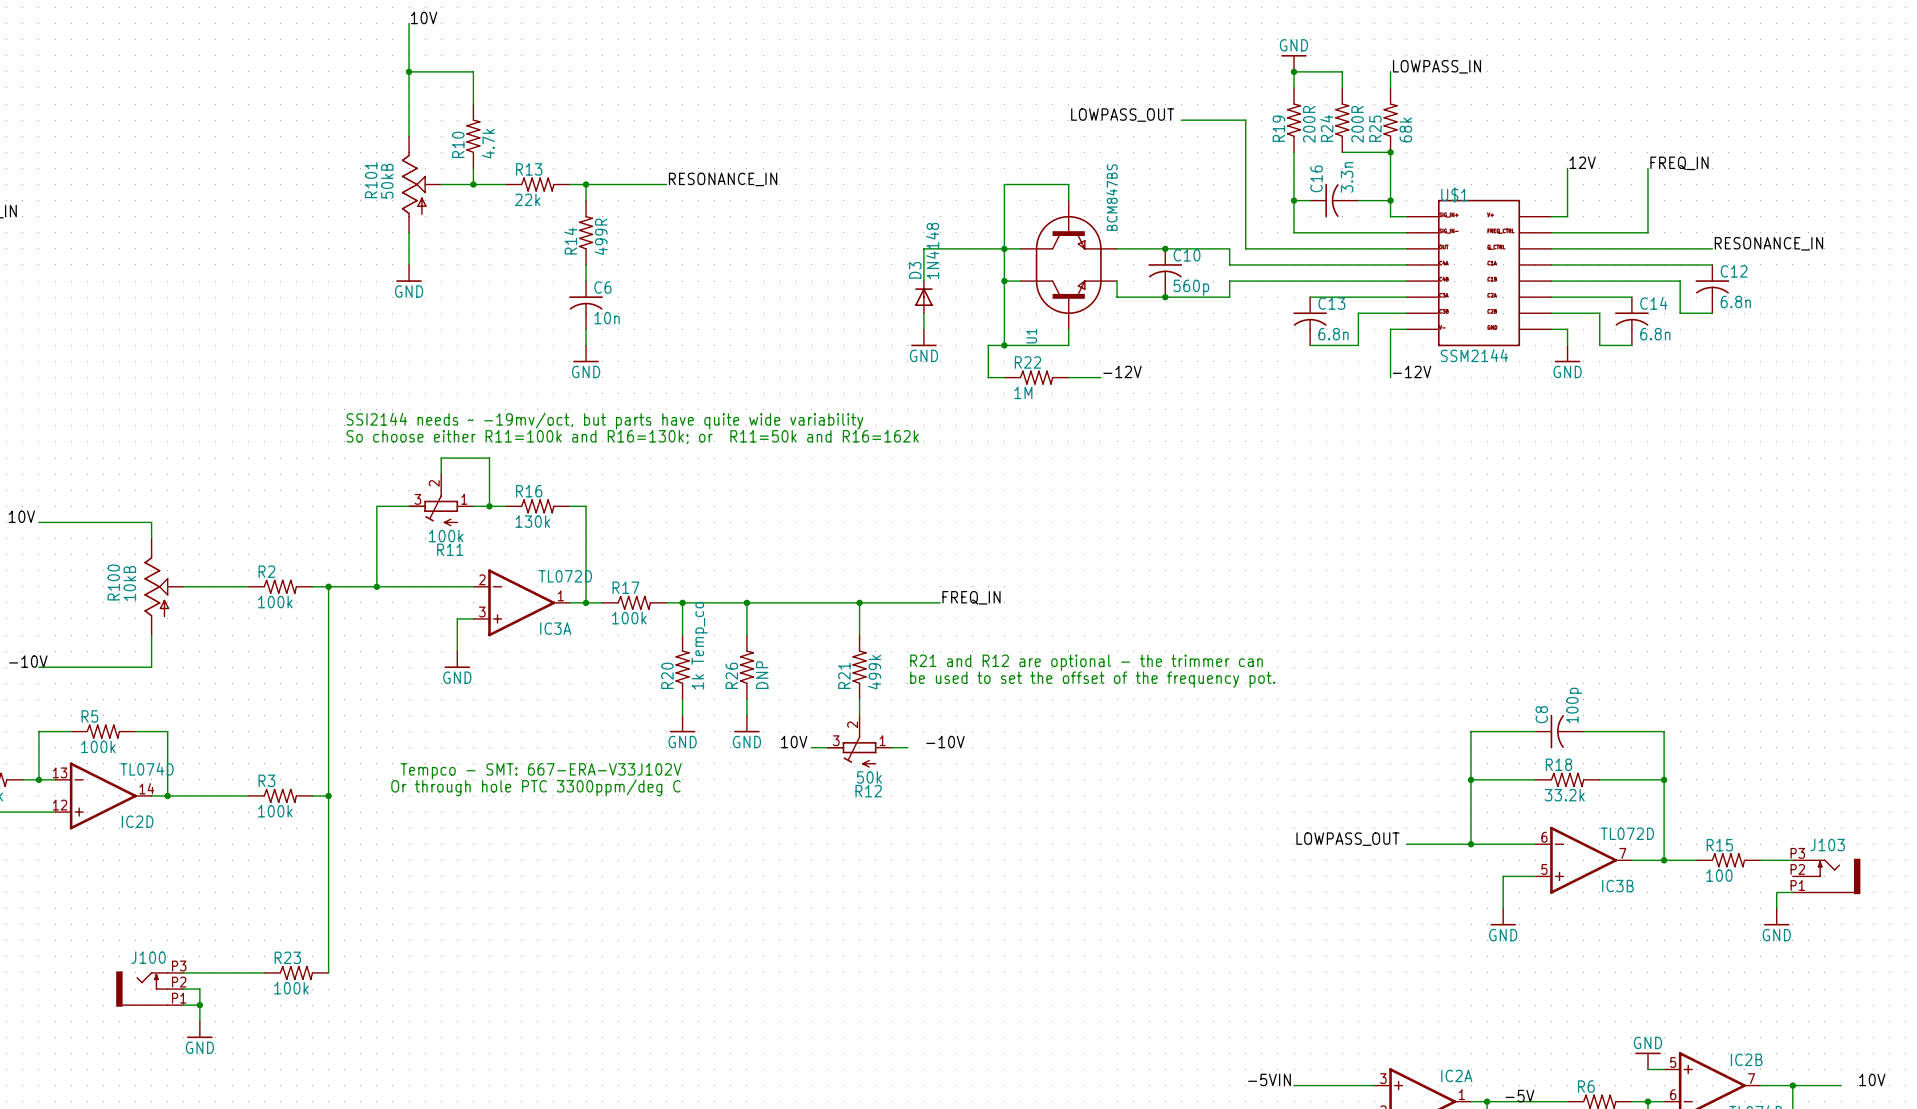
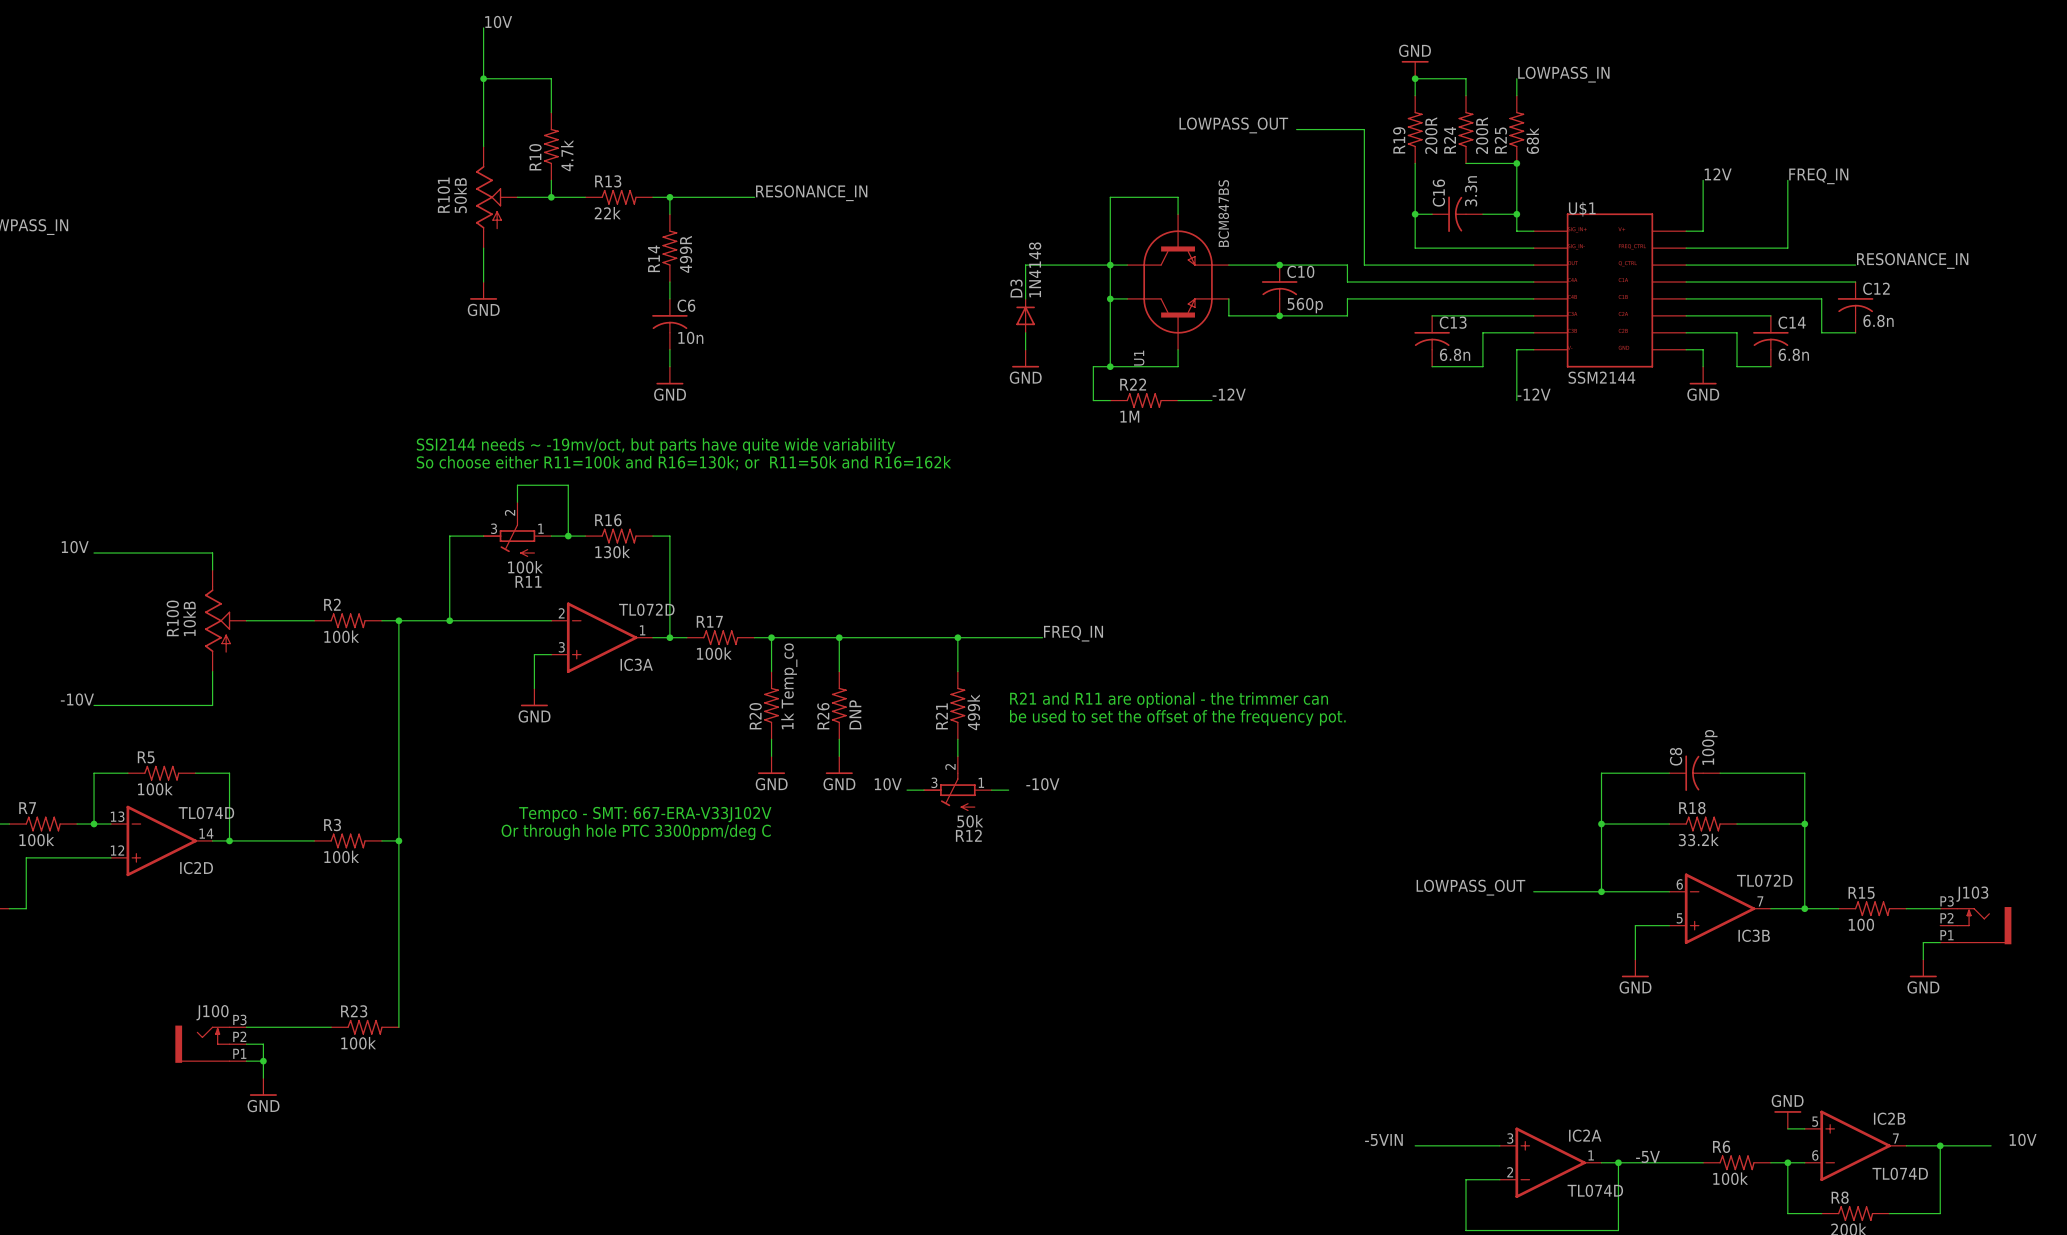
text: R21 and R12 are optional - the trimmer can (1086, 662) -> R21 and R11 are optional - the trimmer can (1169, 700)

